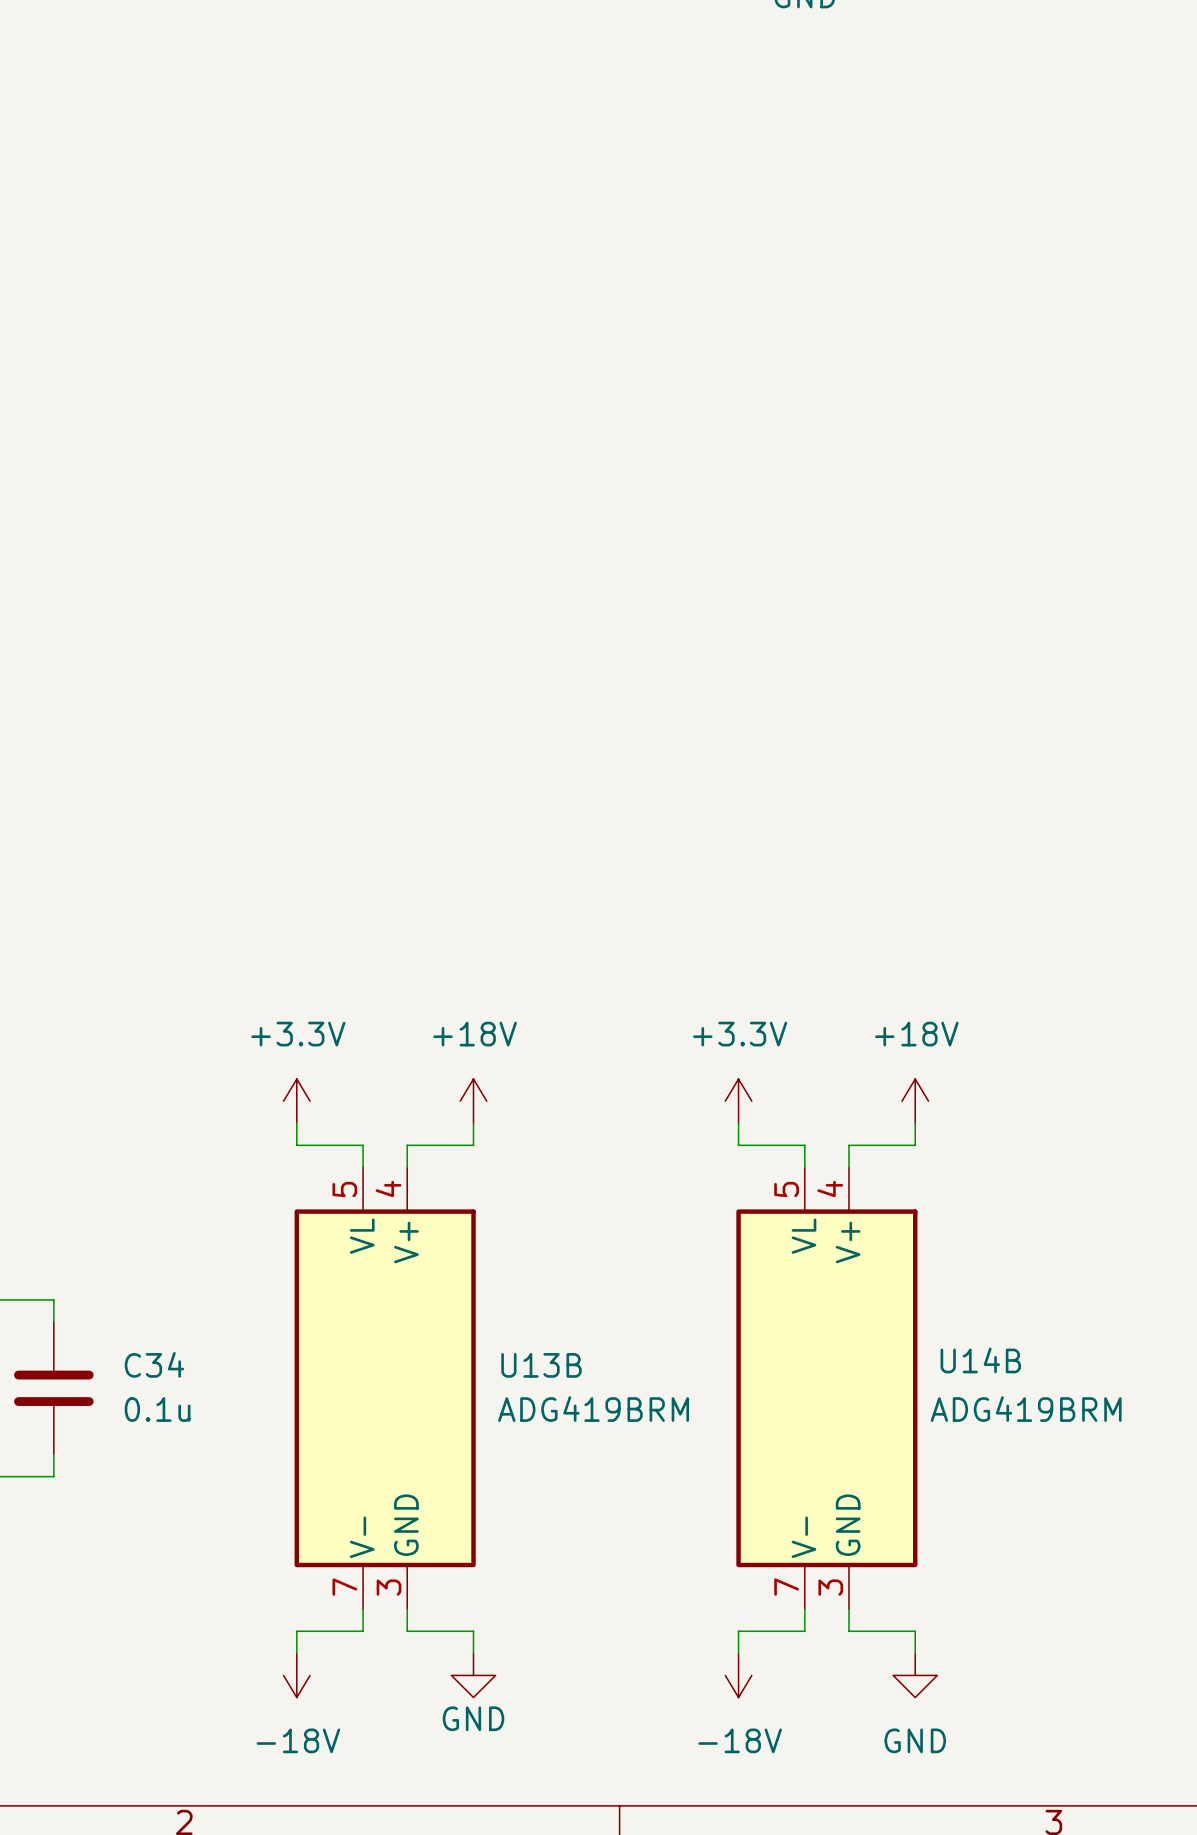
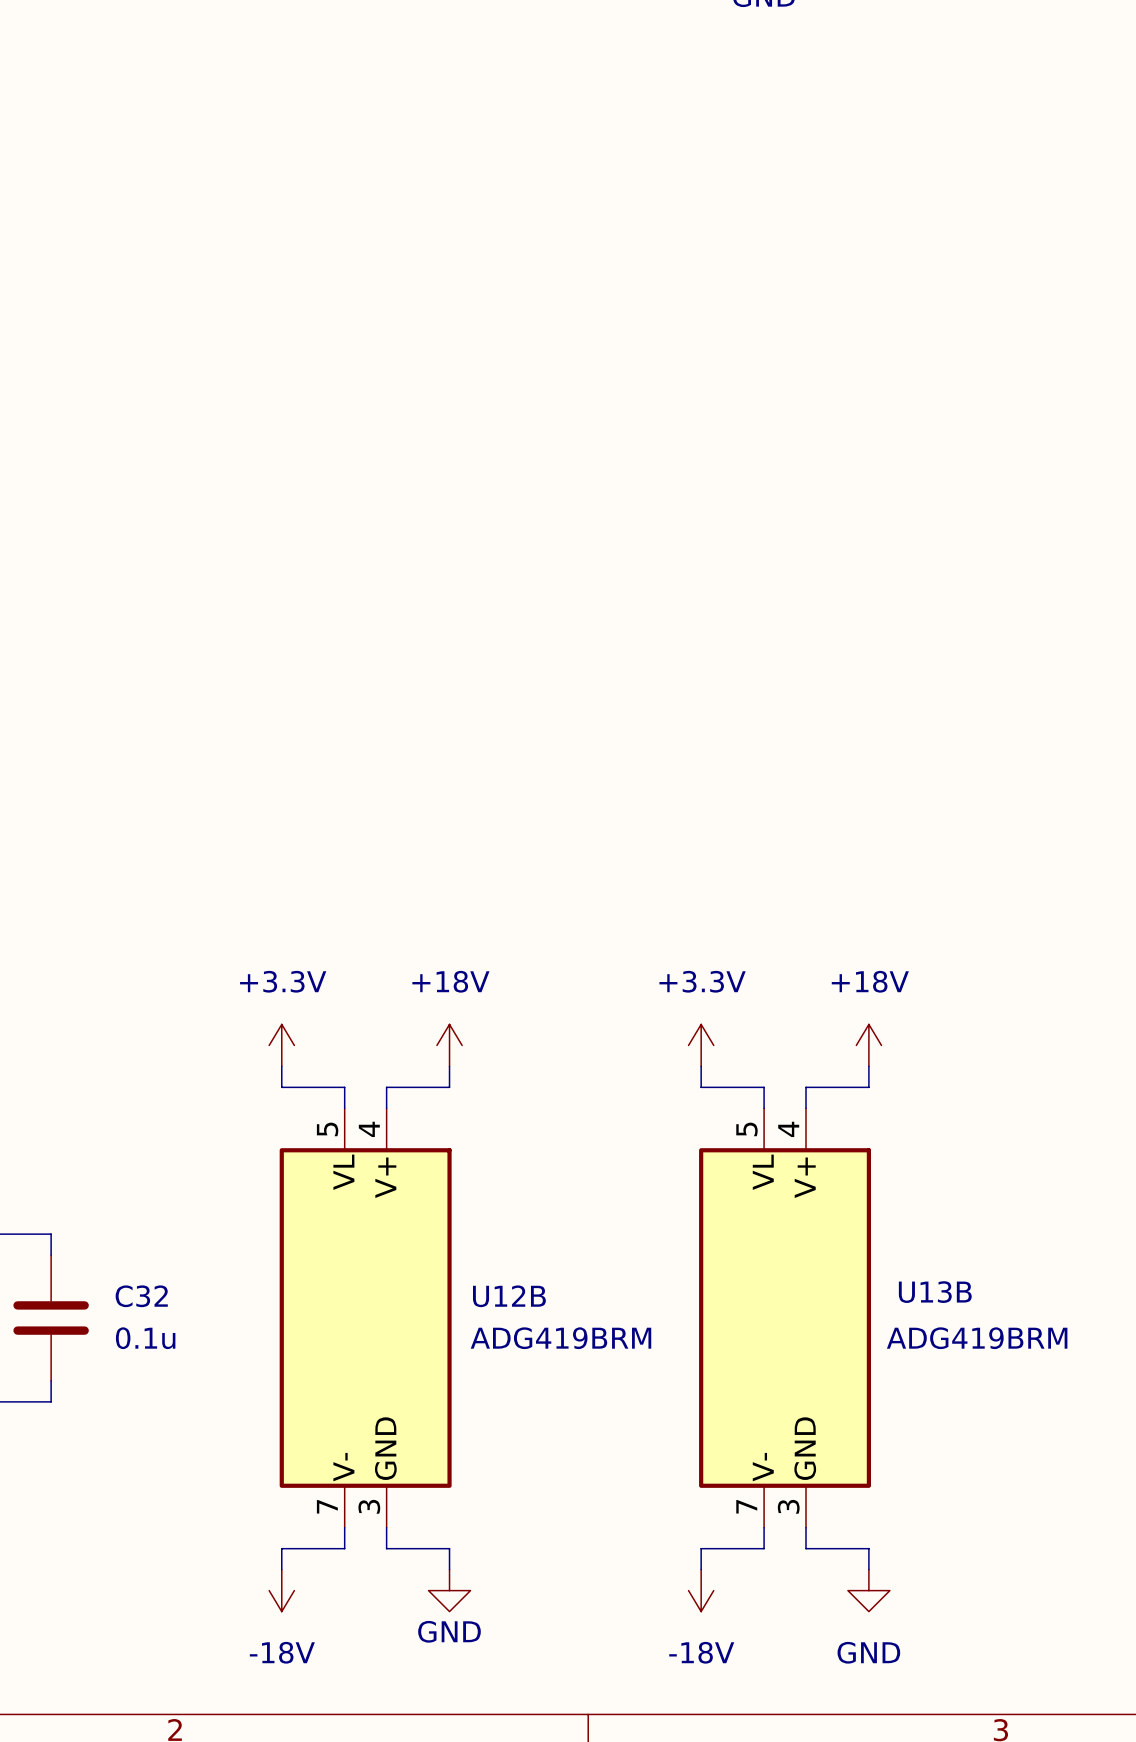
U14B name: U14B (980, 1360) -> U13B (935, 1292)
C34 name: C34 (154, 1364) -> C32 (141, 1296)
U13B name: U13B (541, 1365) -> U12B (509, 1296)

